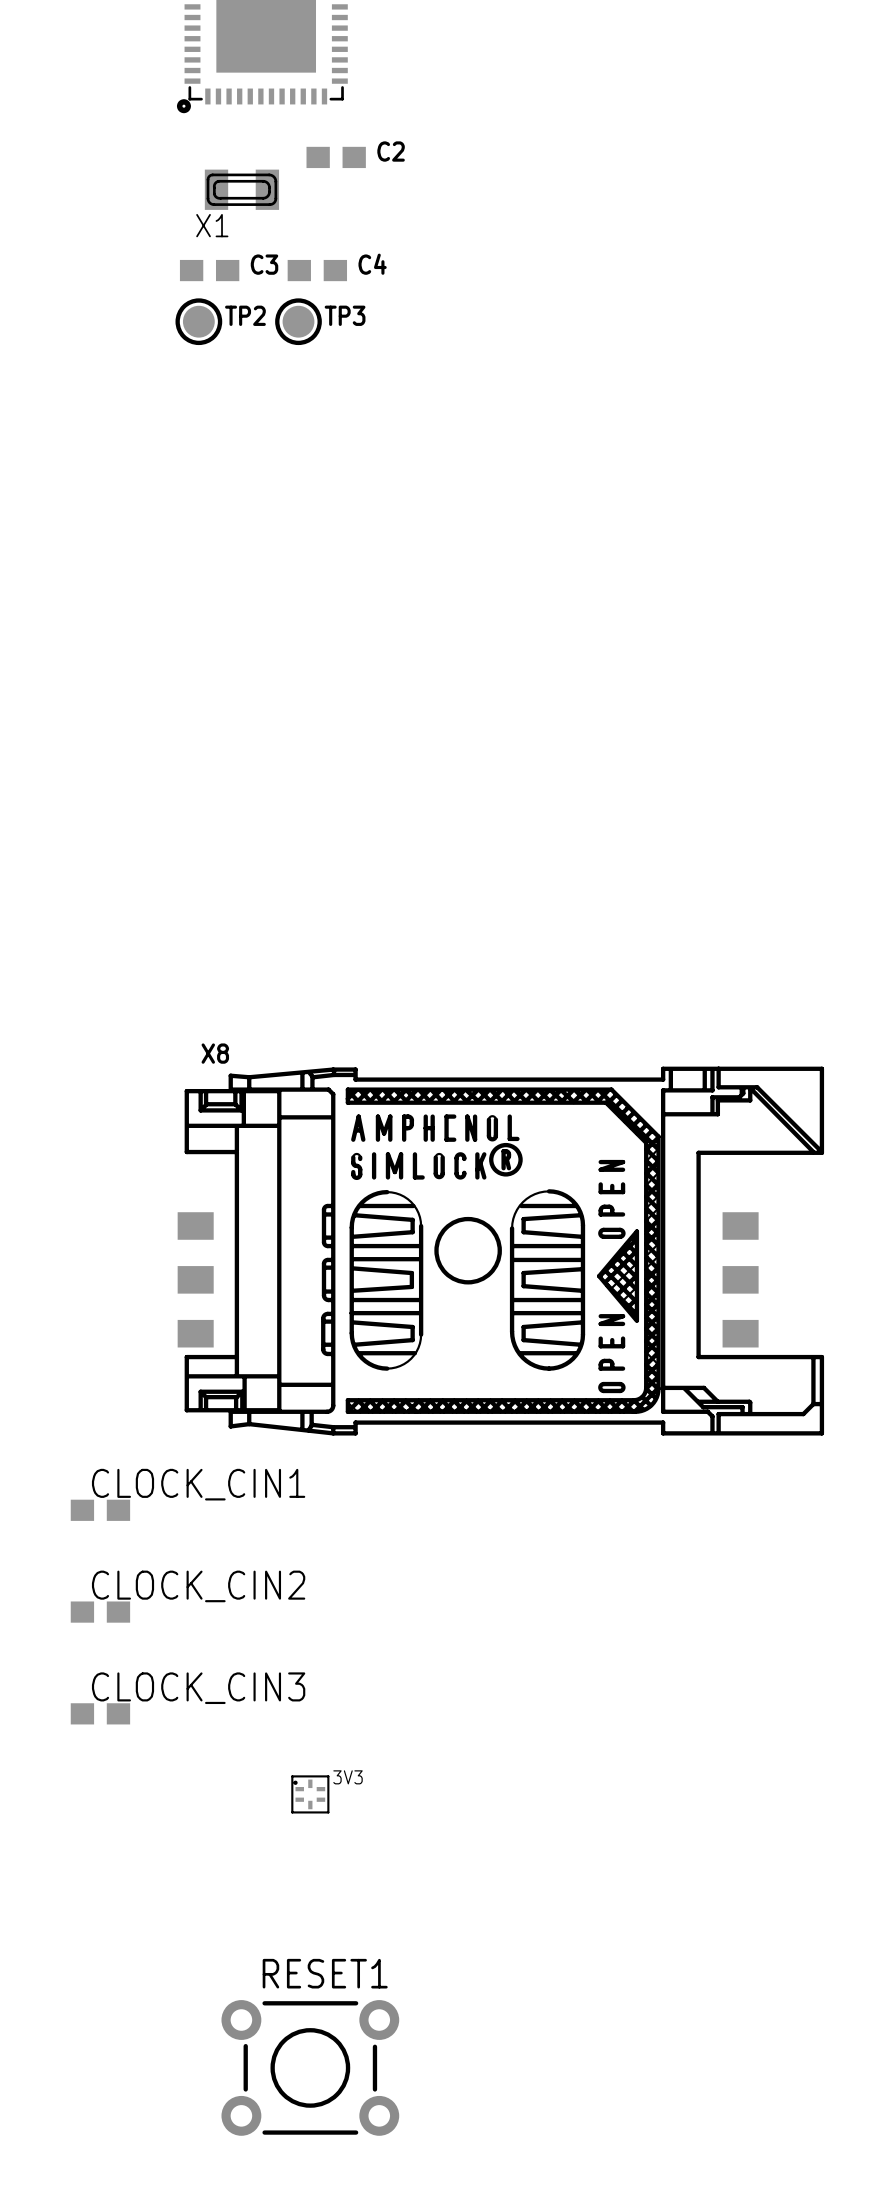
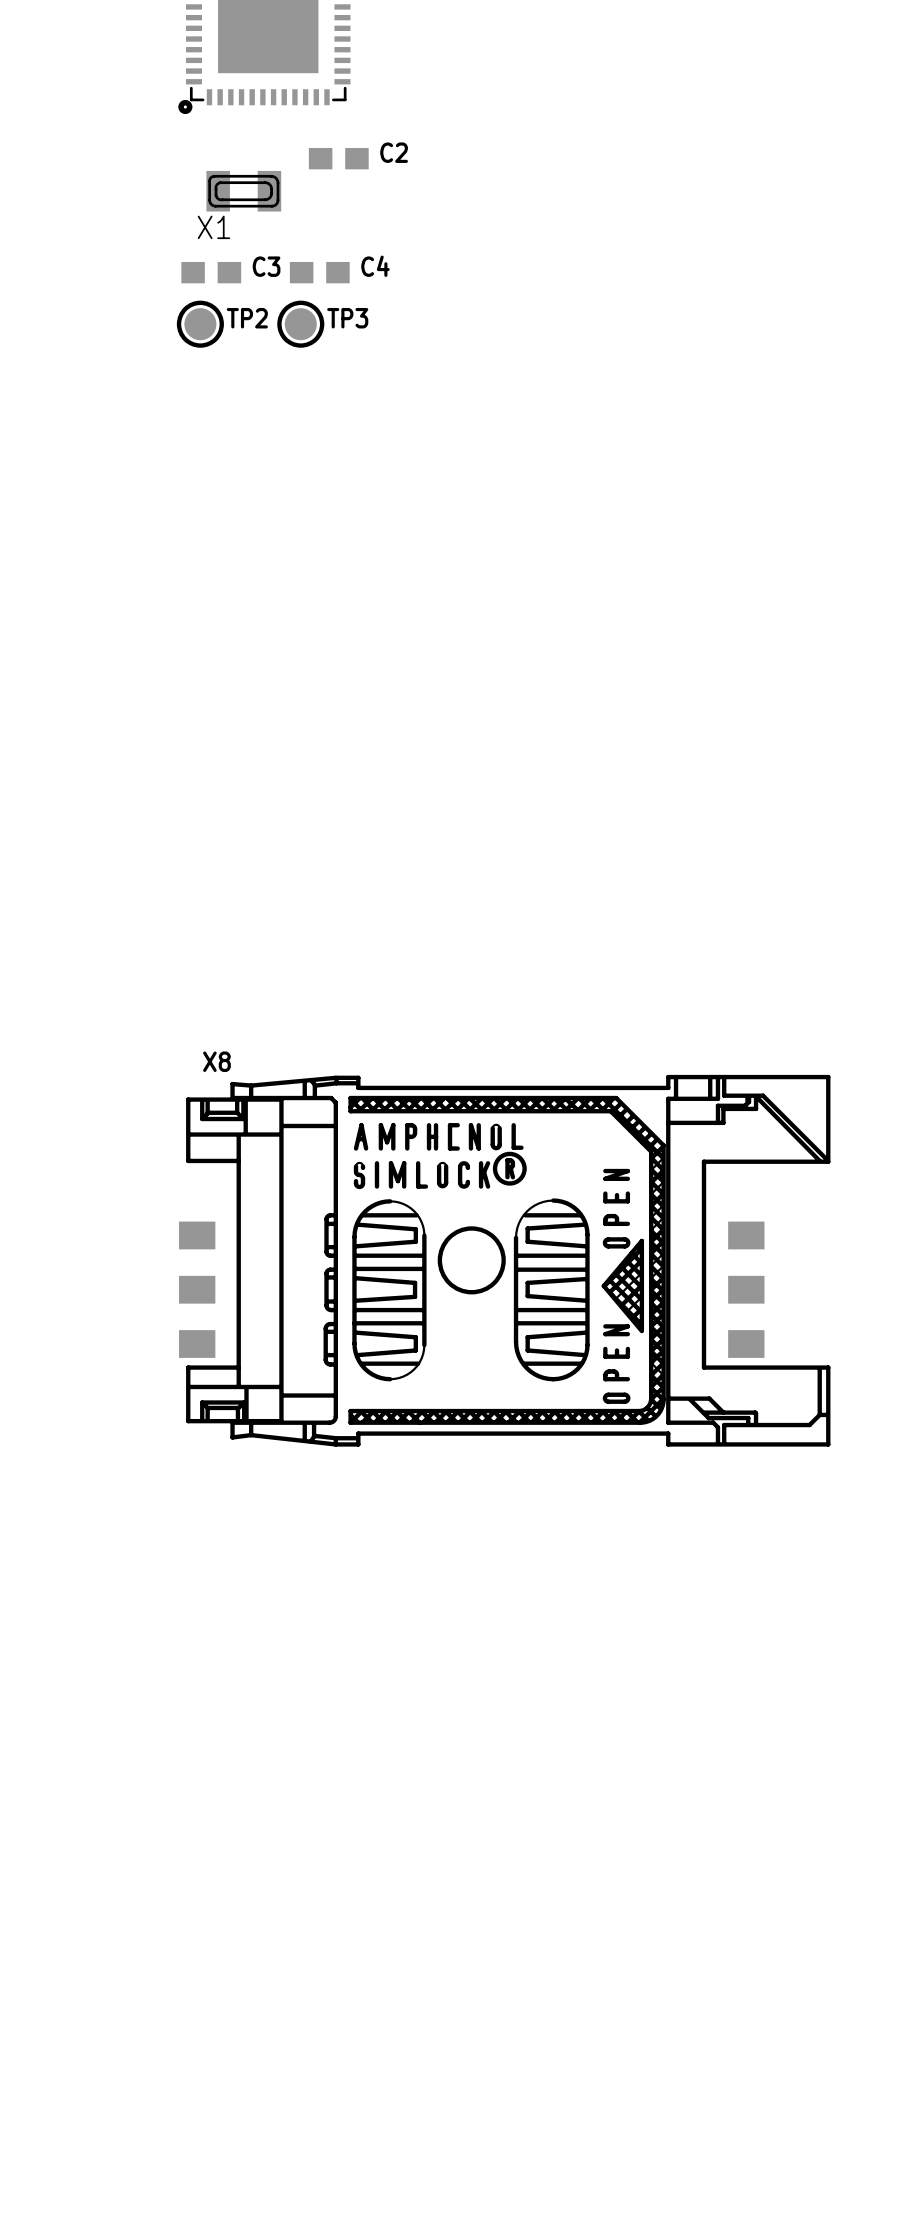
CLOCK_CIN1: (100, 1510) -> none
CLOCK_CIN2: (100, 1612) -> none
CLOCK_CIN3: (100, 1713) -> none
3V3: (310, 1794) -> none
RESET1: (310, 2067) -> none

